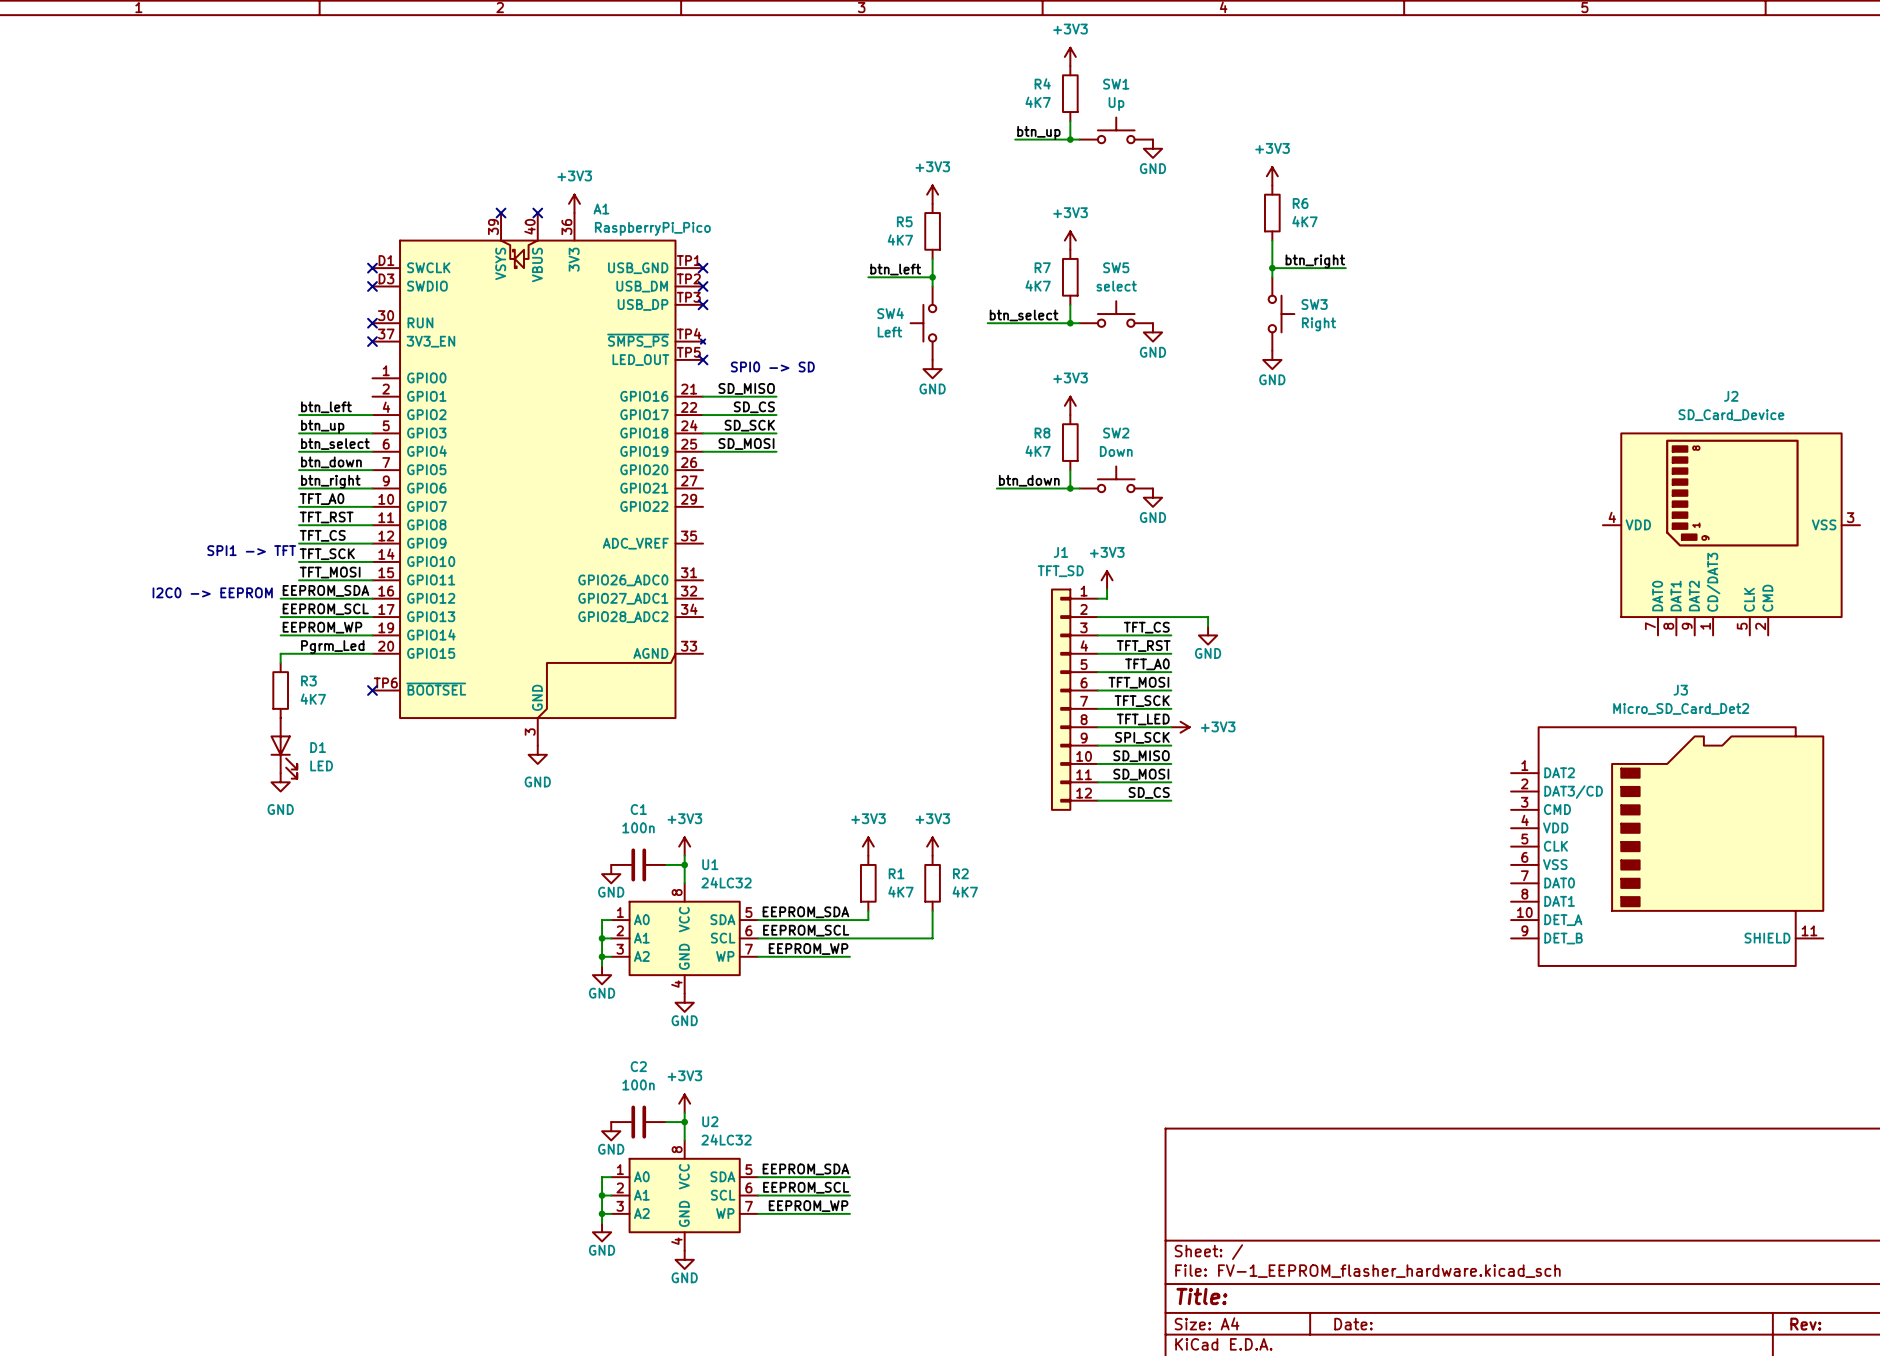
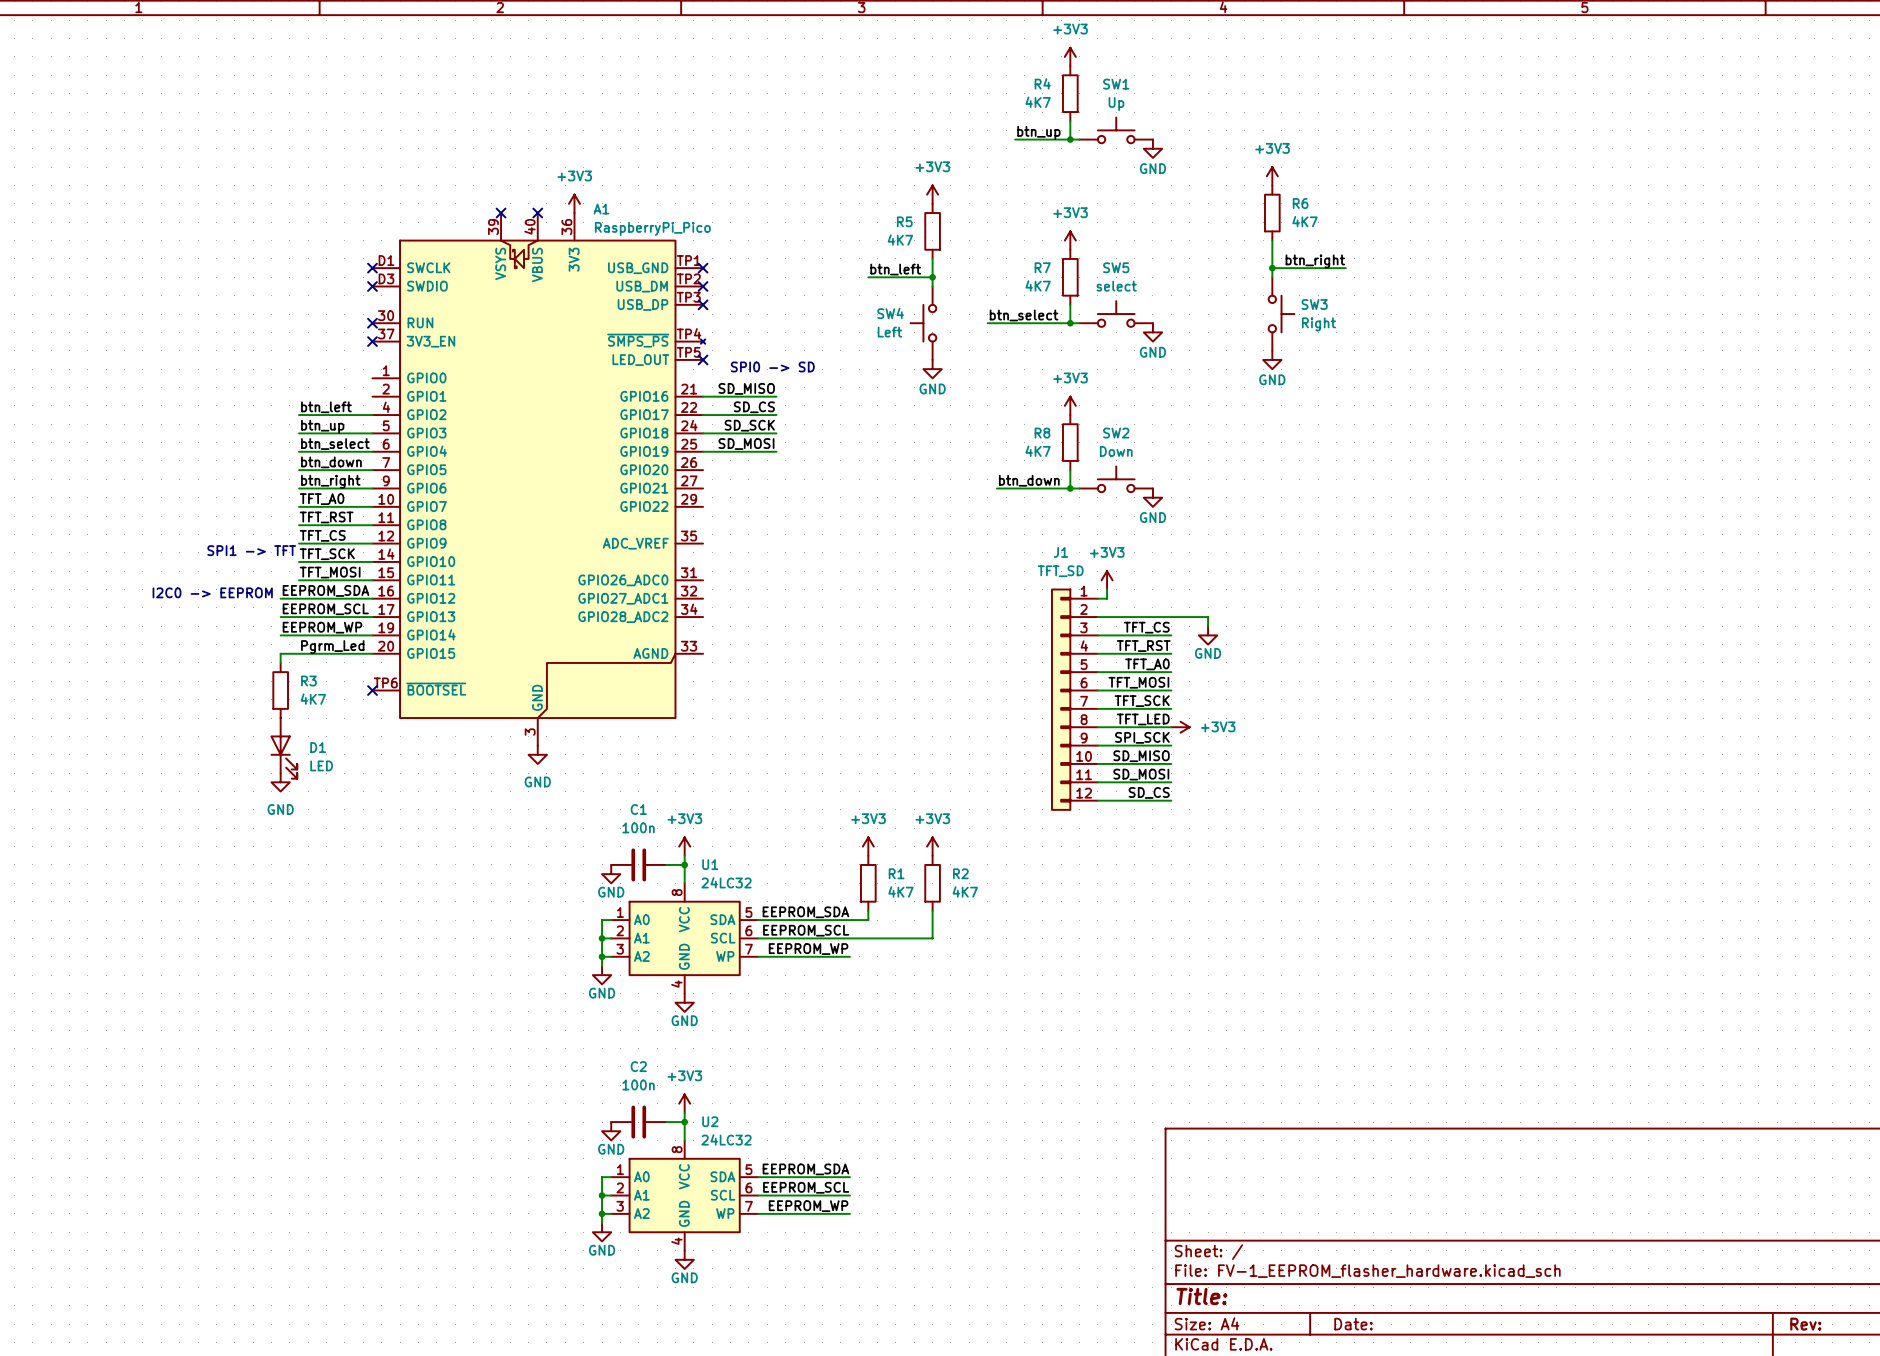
J2: SD_Card_Device (1731, 533) -> none
J3: Micro_SD_Card_Det2 (1667, 846) -> none

